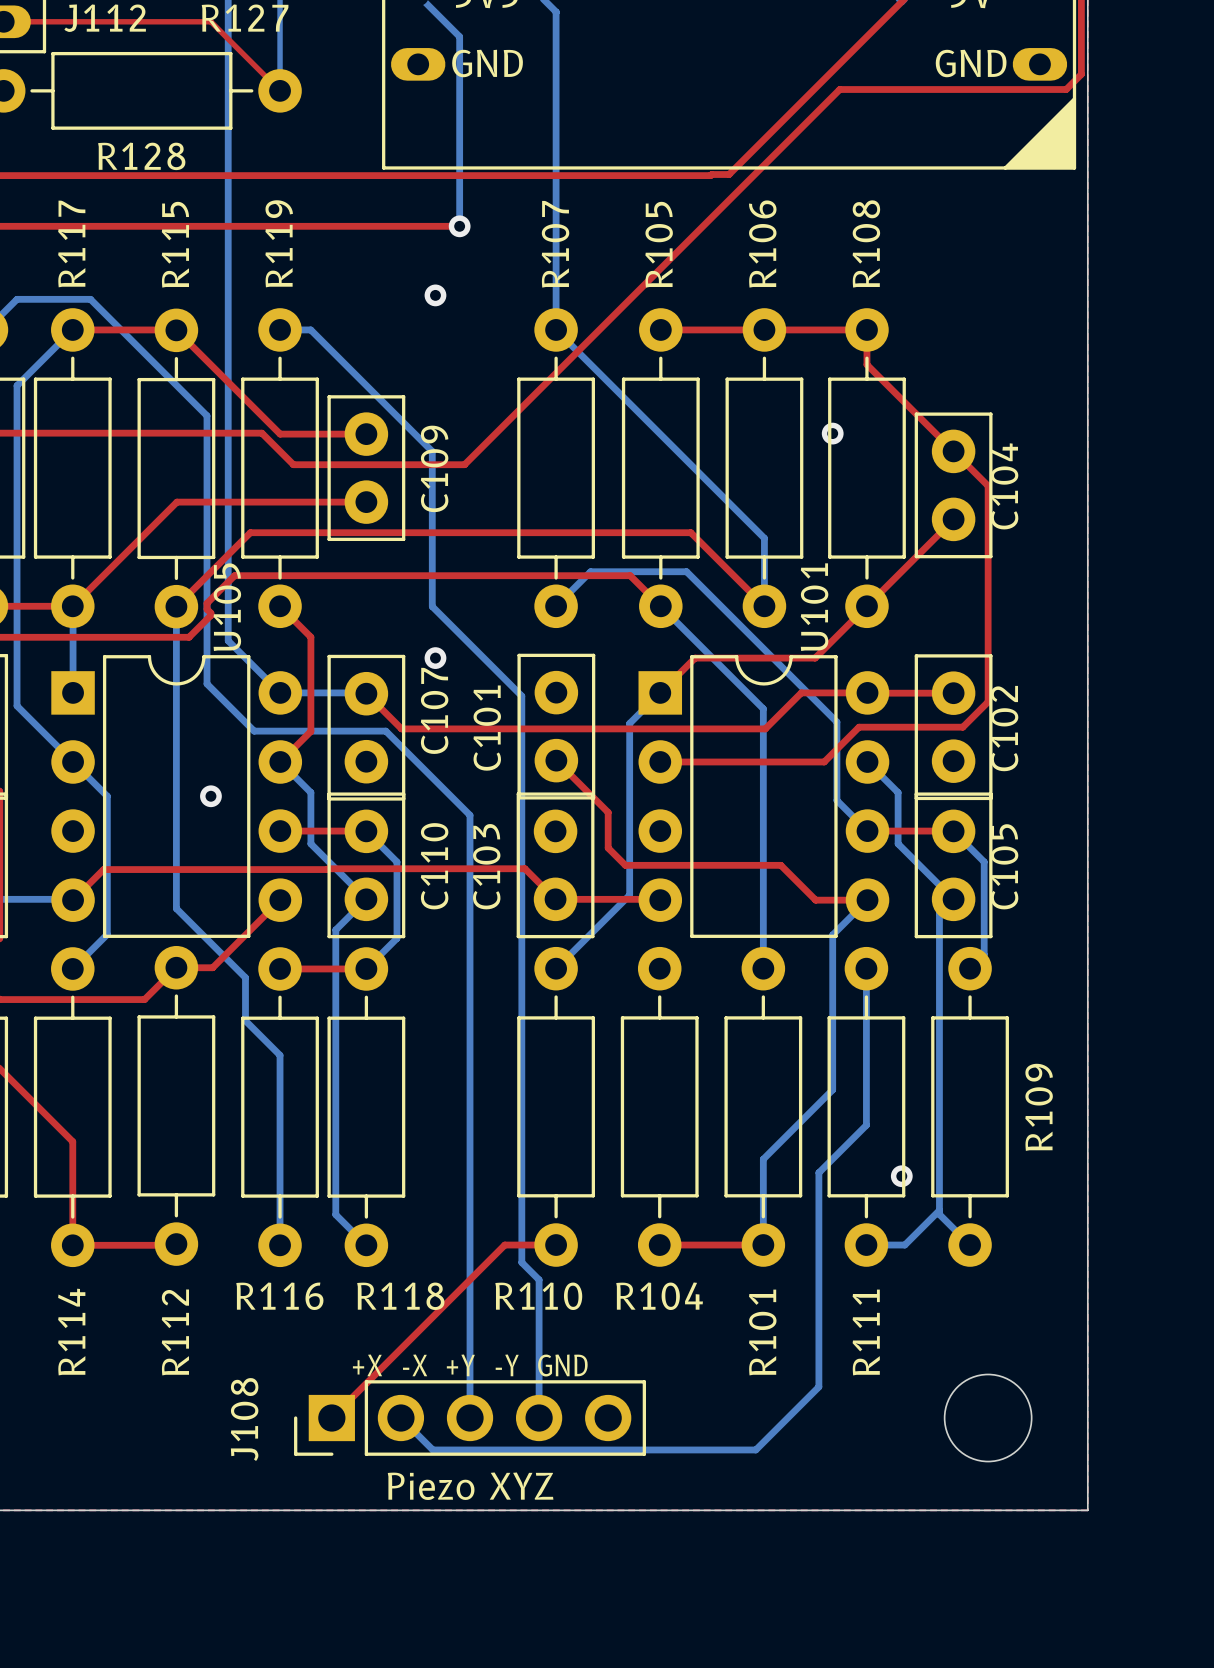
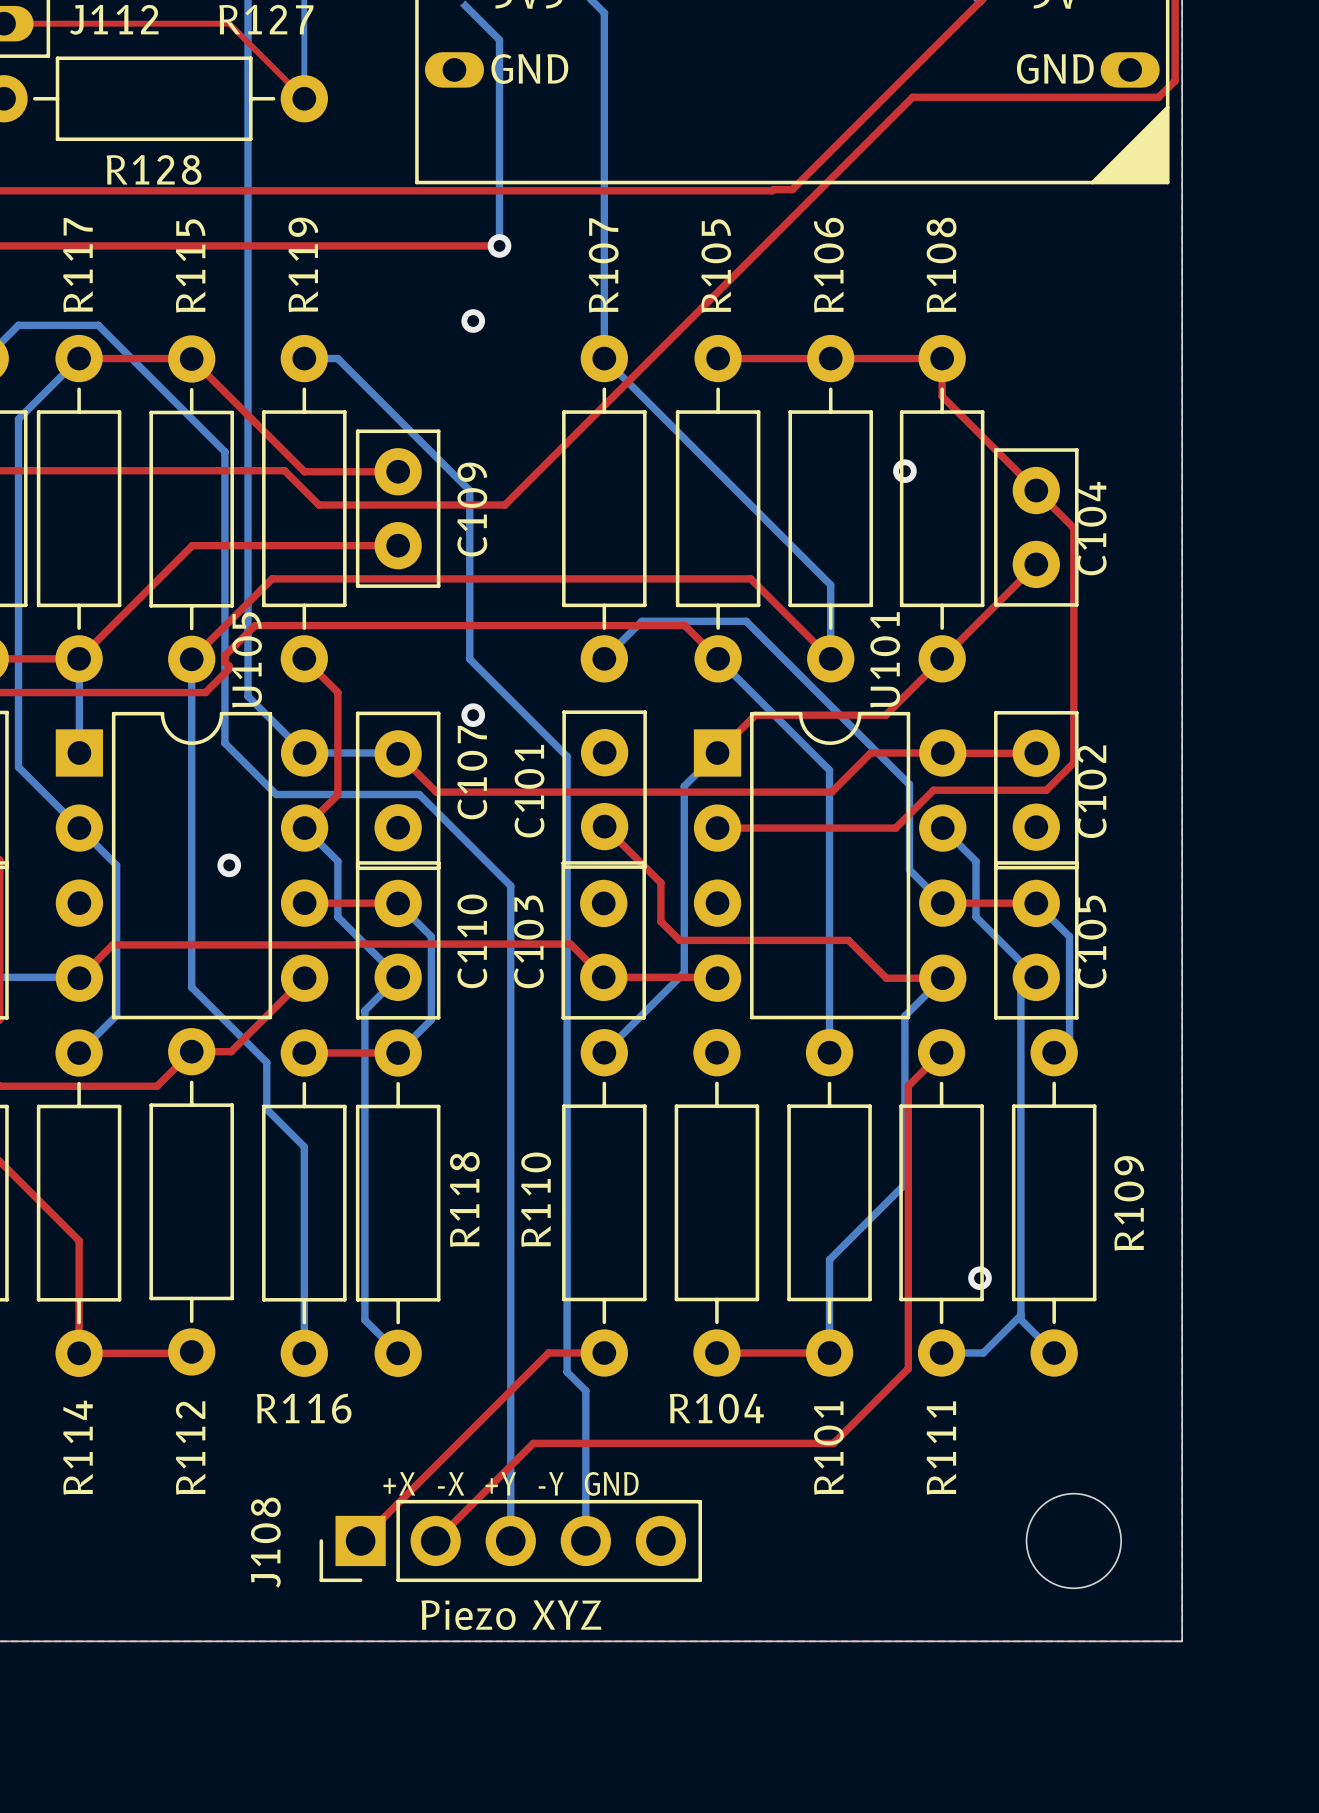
top track: none -> (941, 1052) (908, 1085) (908, 1368) (833, 1443) (533, 1443) (435, 1540)
bottom track: (866, 968) (866, 1125) (818, 1172) (818, 1386) (755, 1449) (432, 1449) (400, 1418) -> none
R118 name rotation: 0° (400, 1296) -> 90° counterclockwise (464, 1199)
R118 name position: R118 (400, 1296) -> R118 (464, 1199)
R110 name rotation: 0° (538, 1296) -> 90° counterclockwise (536, 1199)
R110 name position: R110 (538, 1296) -> R110 (536, 1199)

